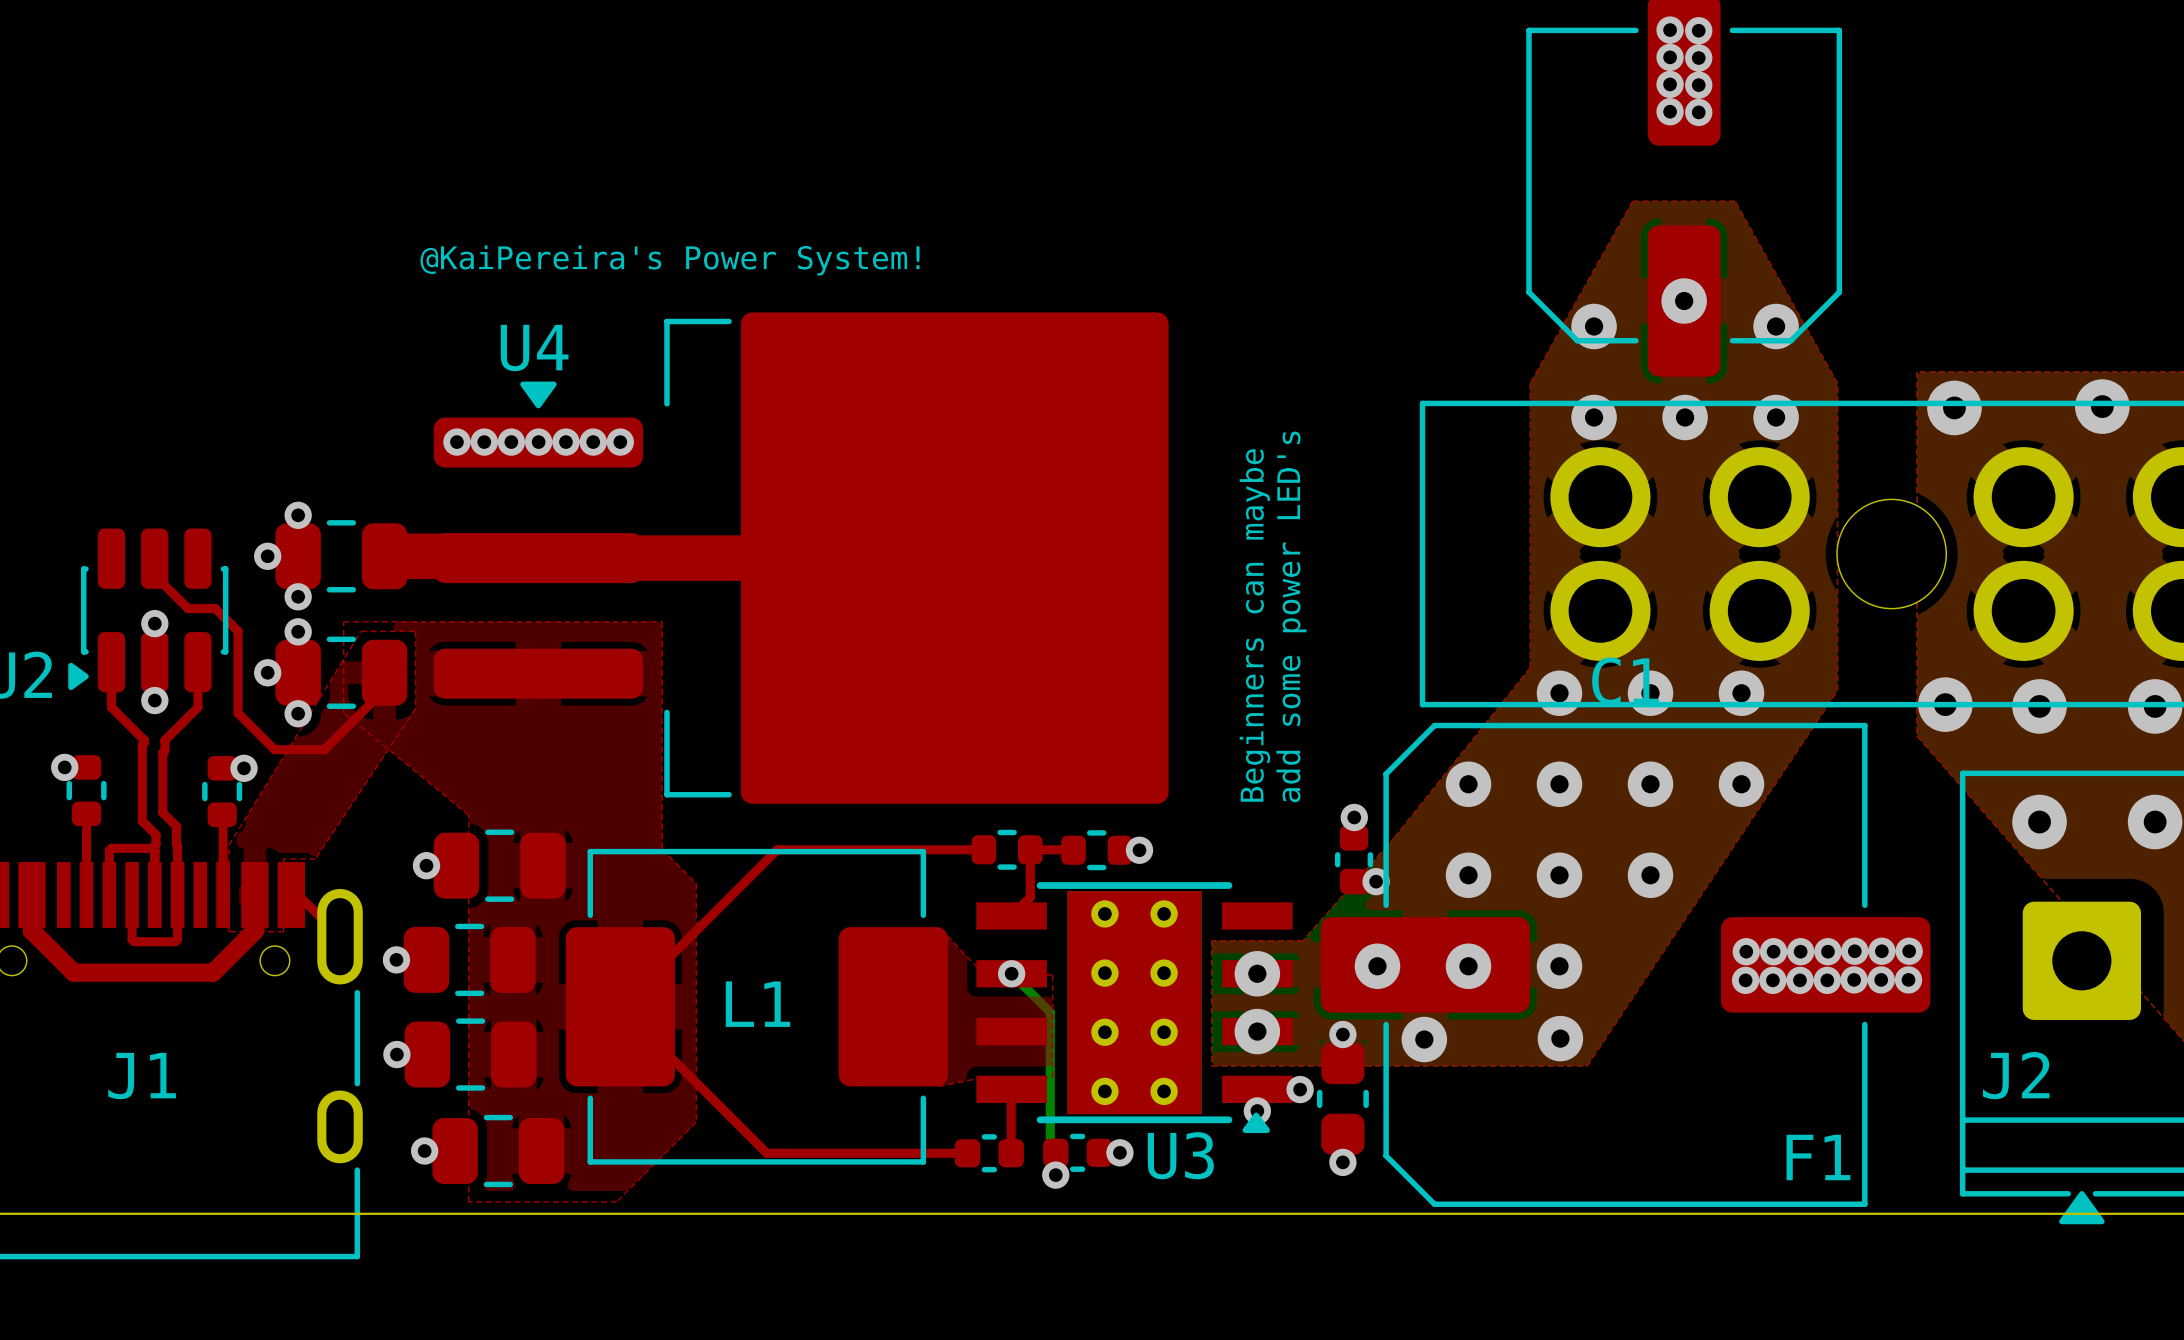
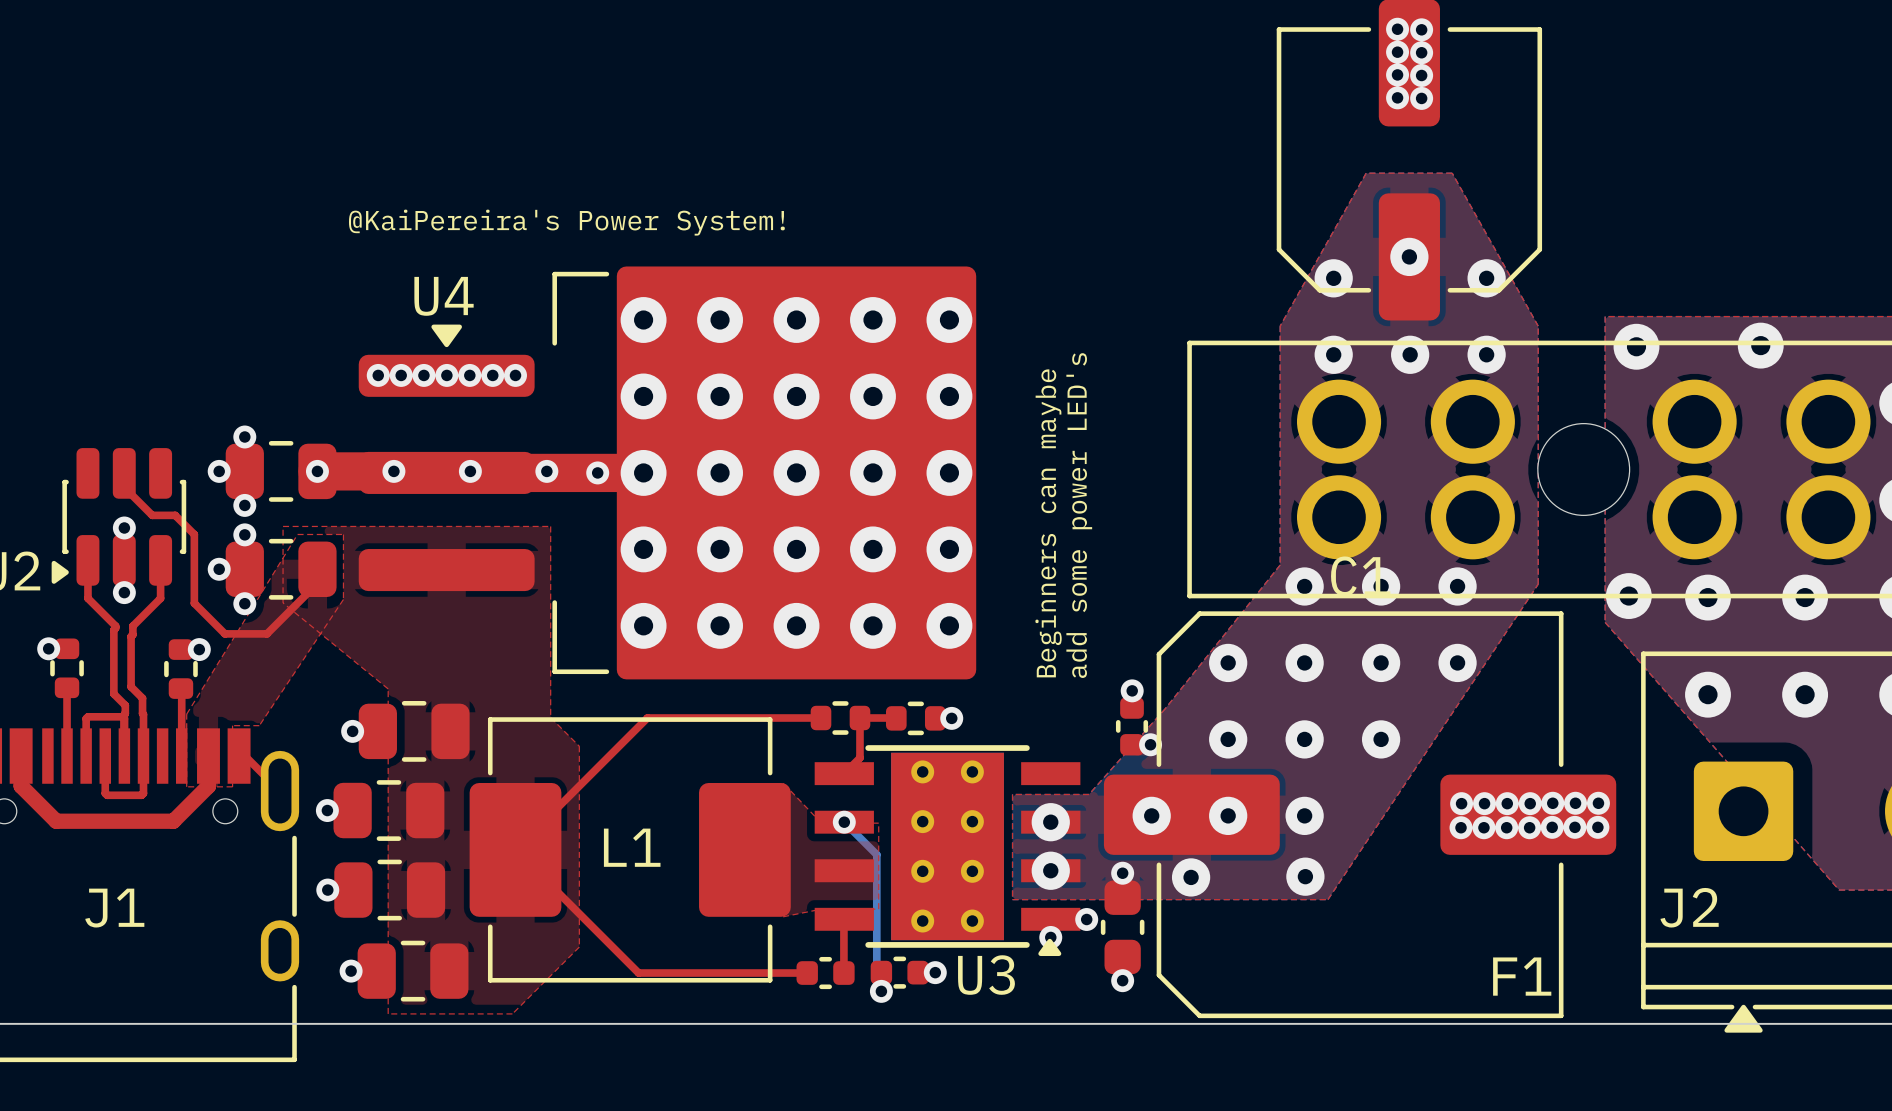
via: none -> (643, 320)
via: none -> (720, 320)
via: none -> (796, 320)
via: none -> (872, 320)
via: none -> (949, 320)
via: none -> (643, 396)
via: none -> (720, 396)
via: none -> (796, 396)
via: none -> (872, 396)
via: none -> (949, 396)
via: none -> (317, 471)
via: none -> (393, 471)
via: none -> (470, 471)
via: none -> (546, 471)
via: none -> (597, 472)
via: none -> (643, 472)
via: none -> (720, 472)
via: none -> (796, 472)
via: none -> (872, 472)
via: none -> (949, 472)
via: none -> (643, 549)
via: none -> (720, 549)
via: none -> (796, 549)
via: none -> (872, 549)
via: none -> (949, 549)
via: none -> (643, 625)
via: none -> (720, 625)
via: none -> (796, 625)
via: none -> (872, 625)
via: none -> (949, 625)

